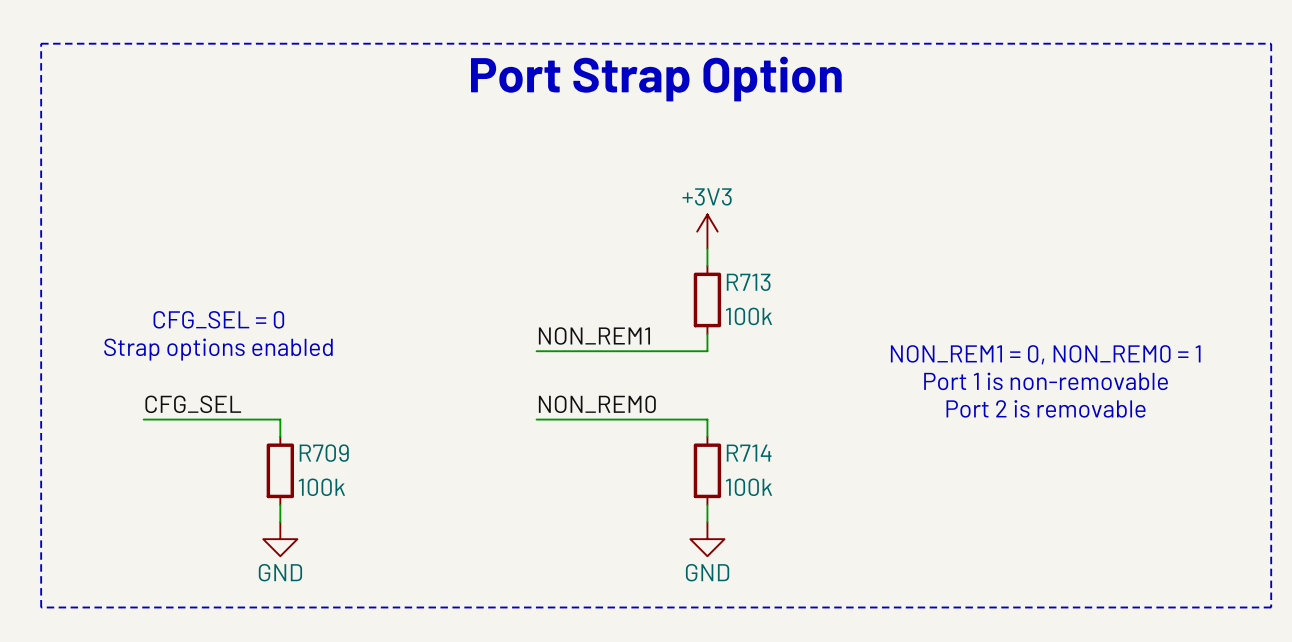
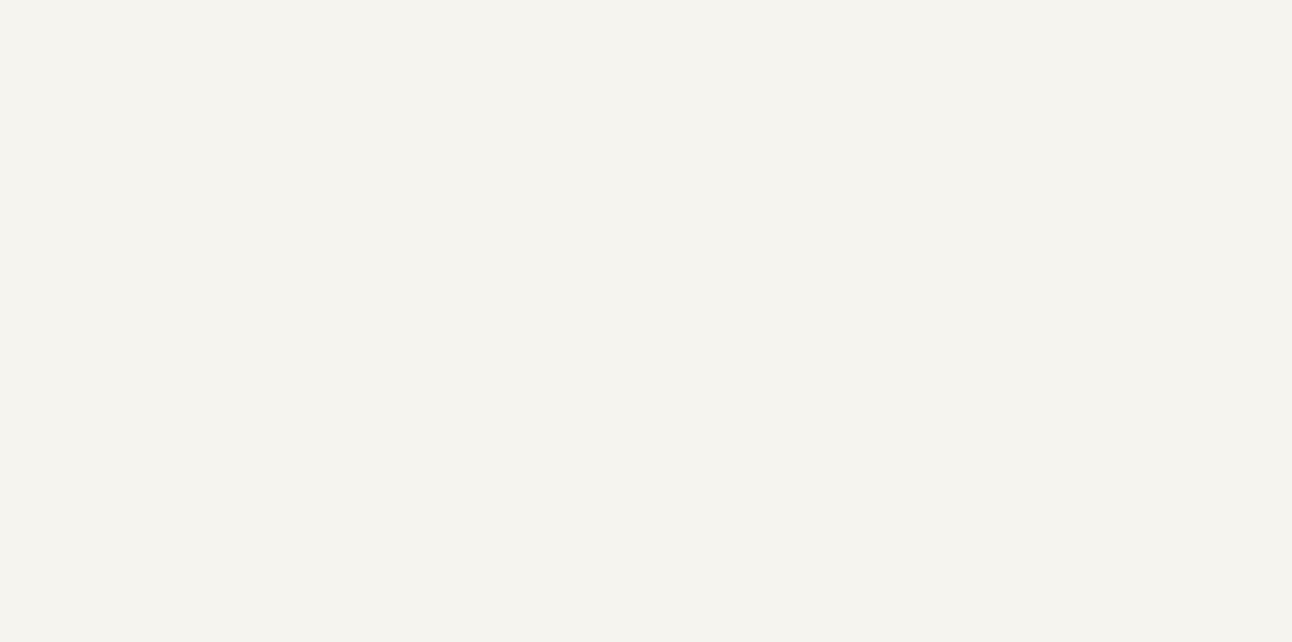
line: (41, 43) (1271, 43) (1271, 607) (41, 607) (41, 43) -> none
text: Port Strap Option (656, 79) -> none
power symbol: +3V3 (707, 231) -> none
wire: (707, 248) (707, 265) -> none
R713: (707, 299) -> none
text: CFG_SEL = 0 (218, 319) -> none
wire: (707, 334) (707, 351) (536, 351) -> none
label: NON_REM1 (594, 335) -> none
text: Strap options enabled (218, 349) -> none
text: NON_REM1 = 0, NON_REM0 = 1 (1045, 354) -> none
text: Port 1 is non-removable (1046, 381) -> none
label: CFG_SEL (193, 404) -> none
label: NON_REM0 (597, 404) -> none
text: Port 2 is removable (1046, 408) -> none
wire: (143, 419) (280, 419) (280, 436) -> none
wire: (536, 419) (707, 419) (707, 436) -> none
R709: (280, 470) -> none
R714: (707, 470) -> none
wire: (280, 504) (280, 522) -> none
wire: (707, 504) (707, 522) -> none
power symbol: GND (280, 539) -> none
power symbol: GND (707, 539) -> none

